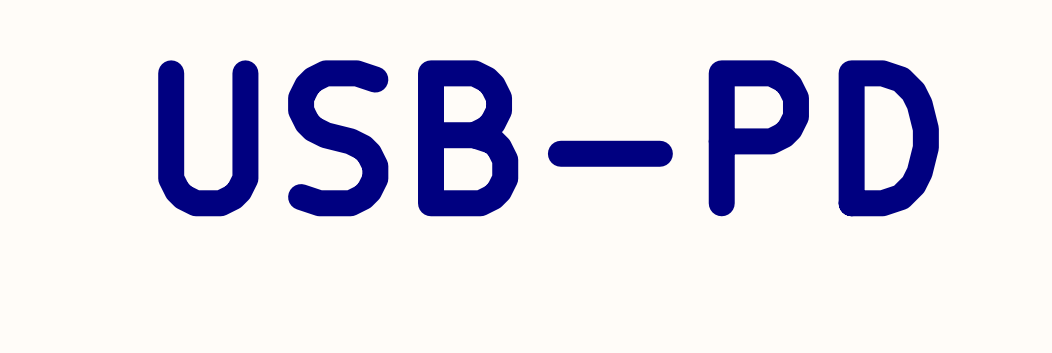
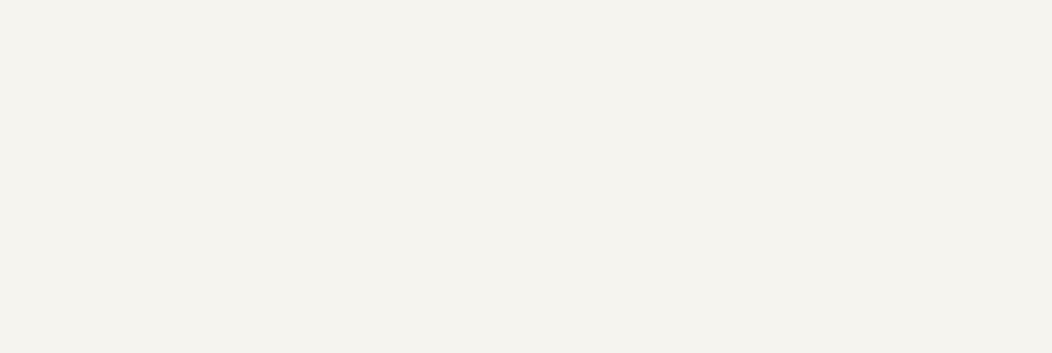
text: USB-PD (548, 138) -> none

